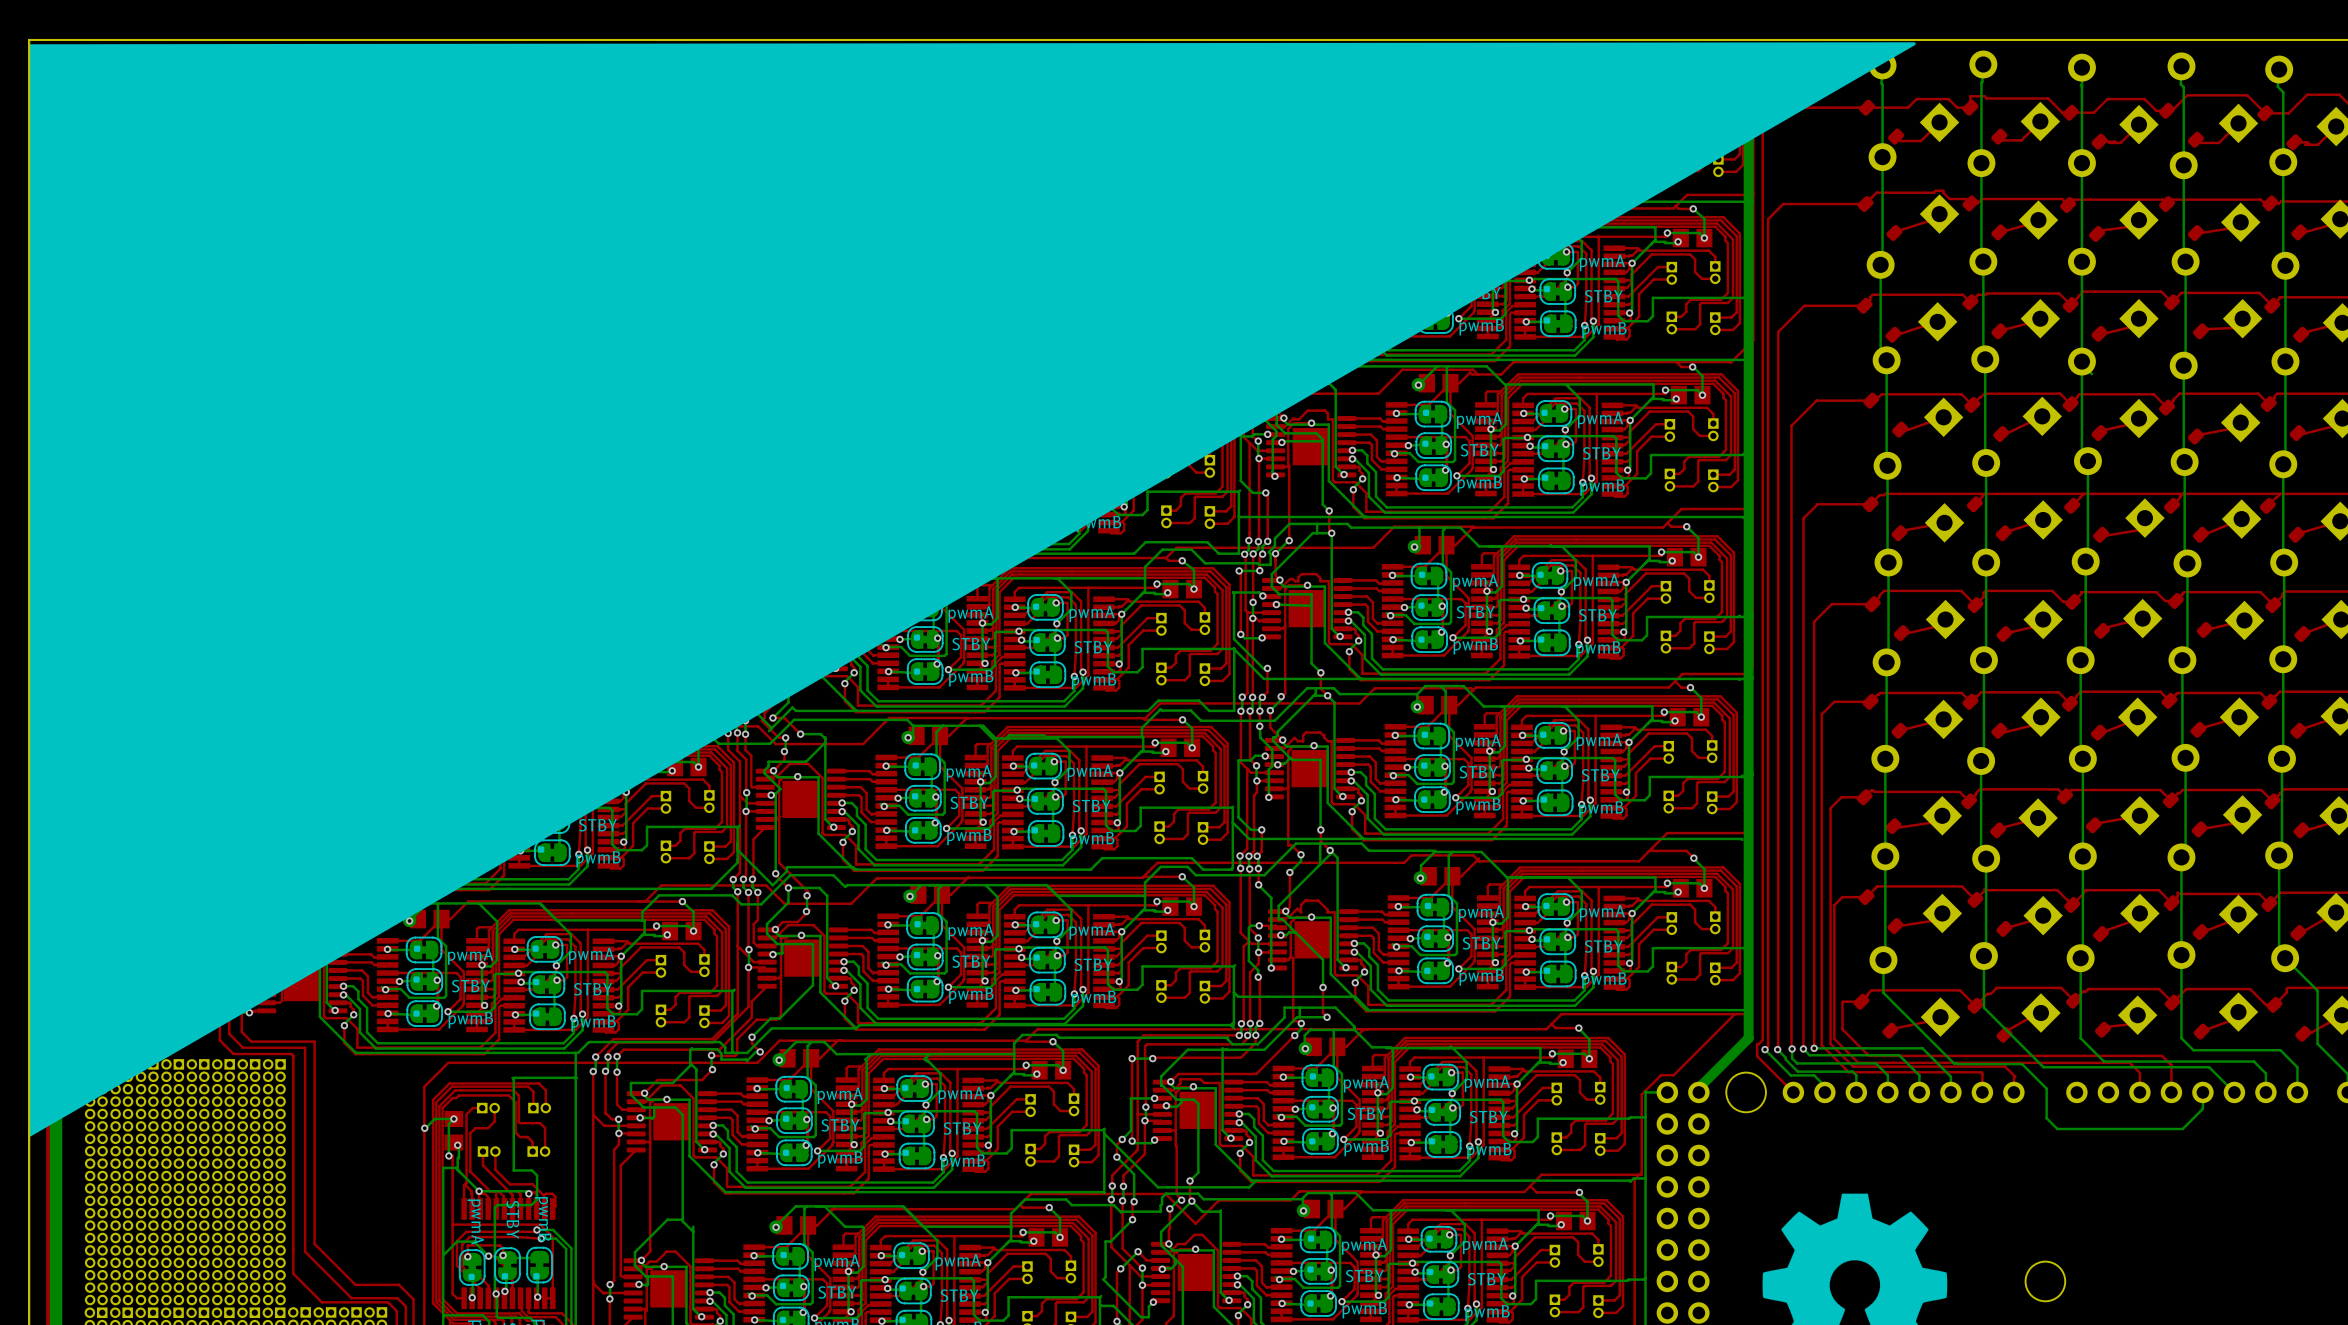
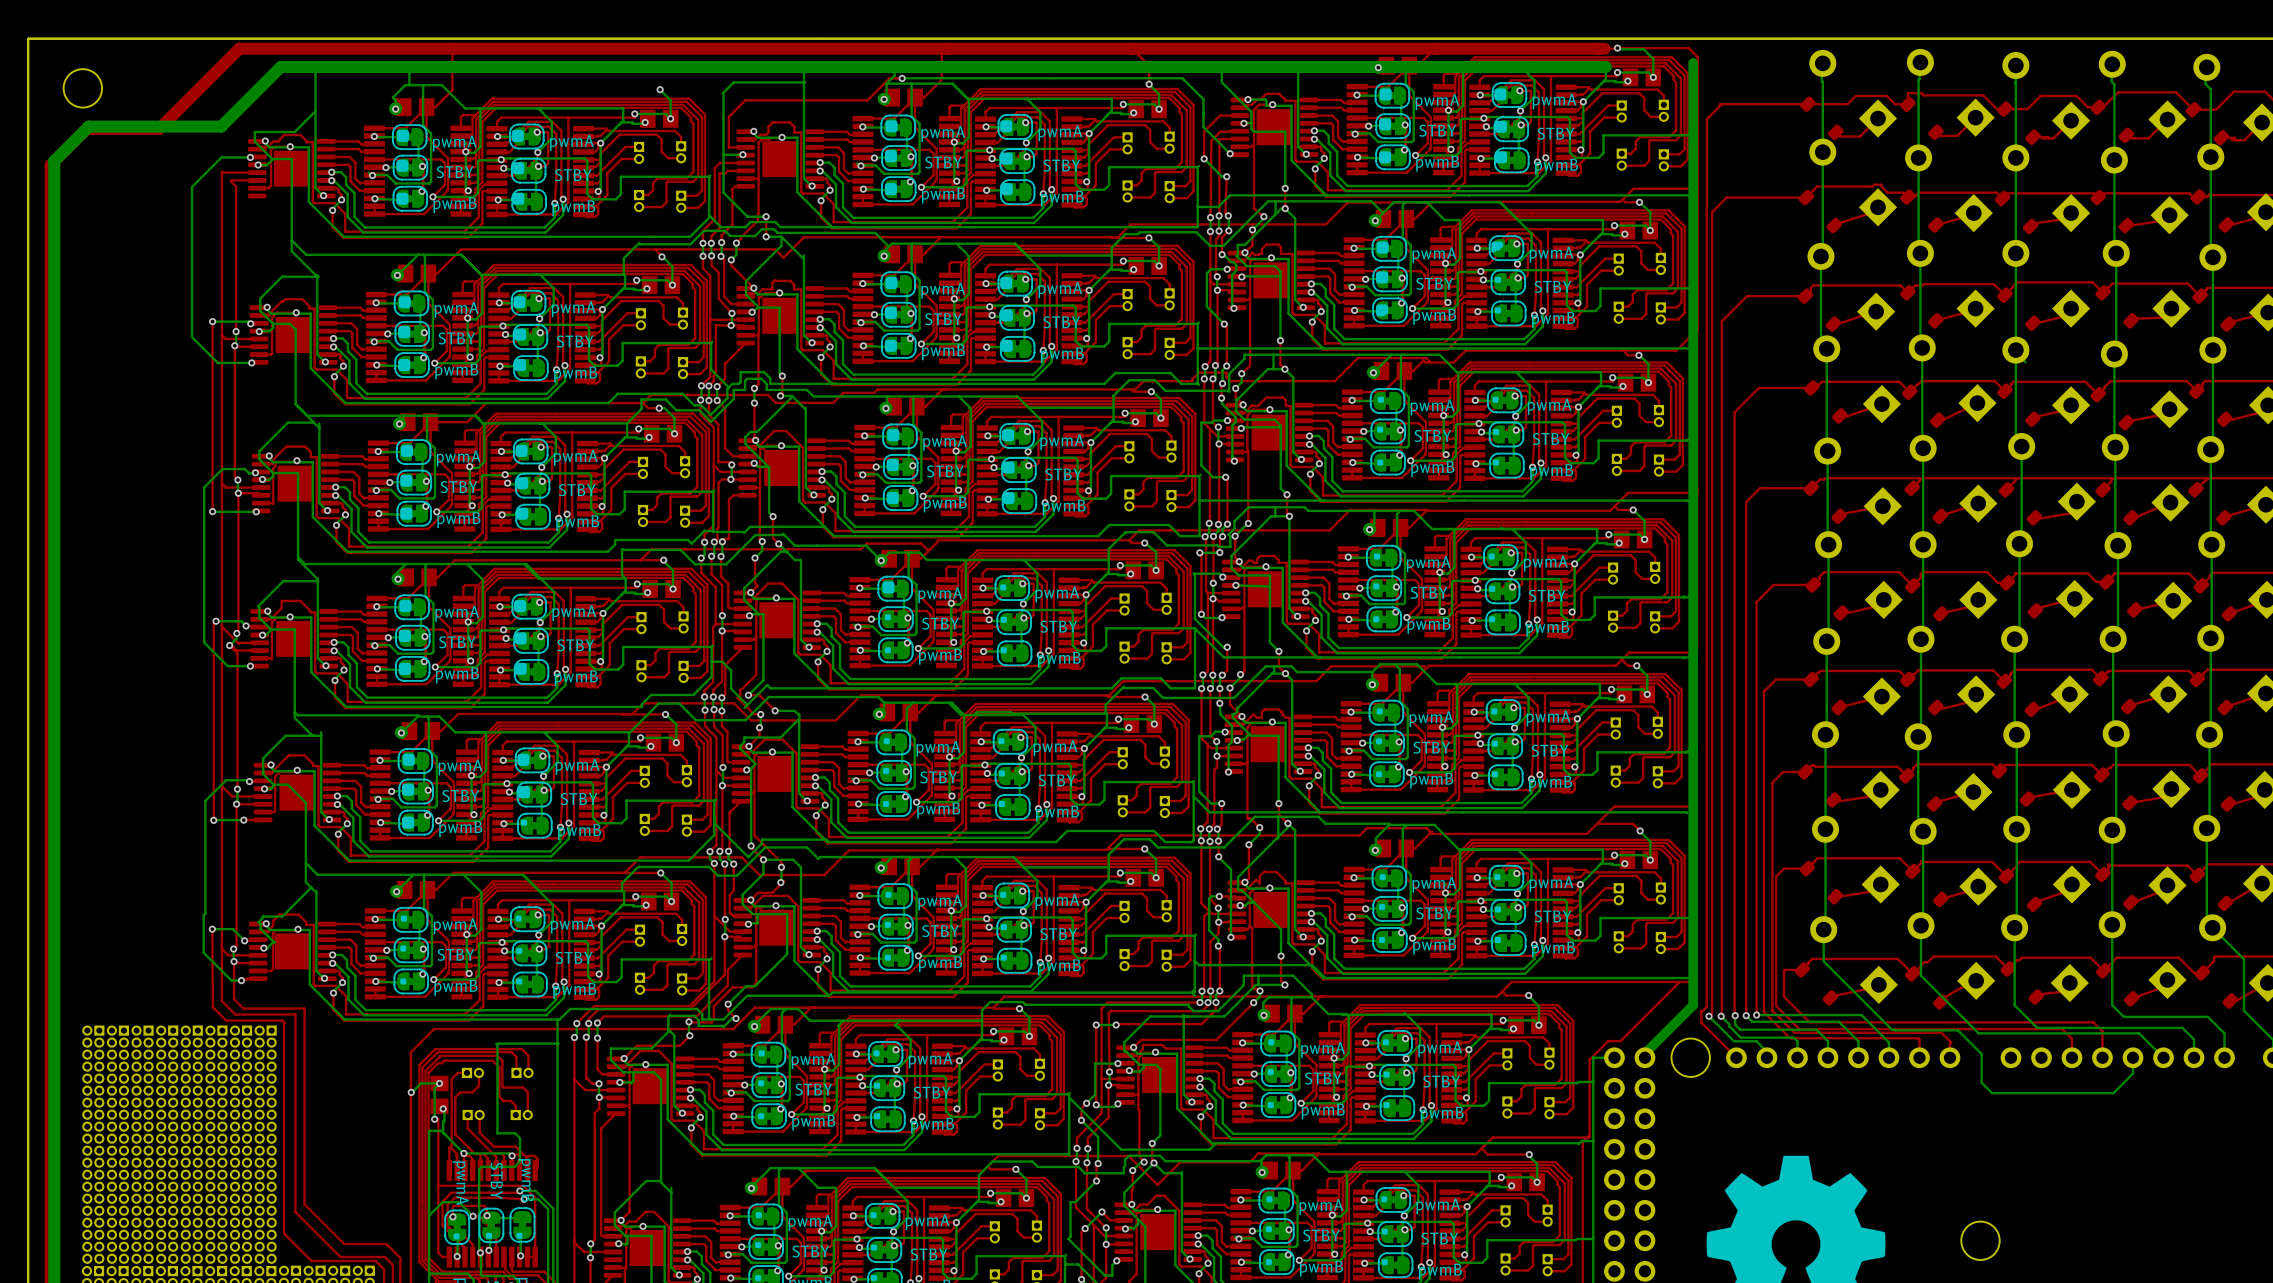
drawing: [28, 42, 1916, 1137] -> none

